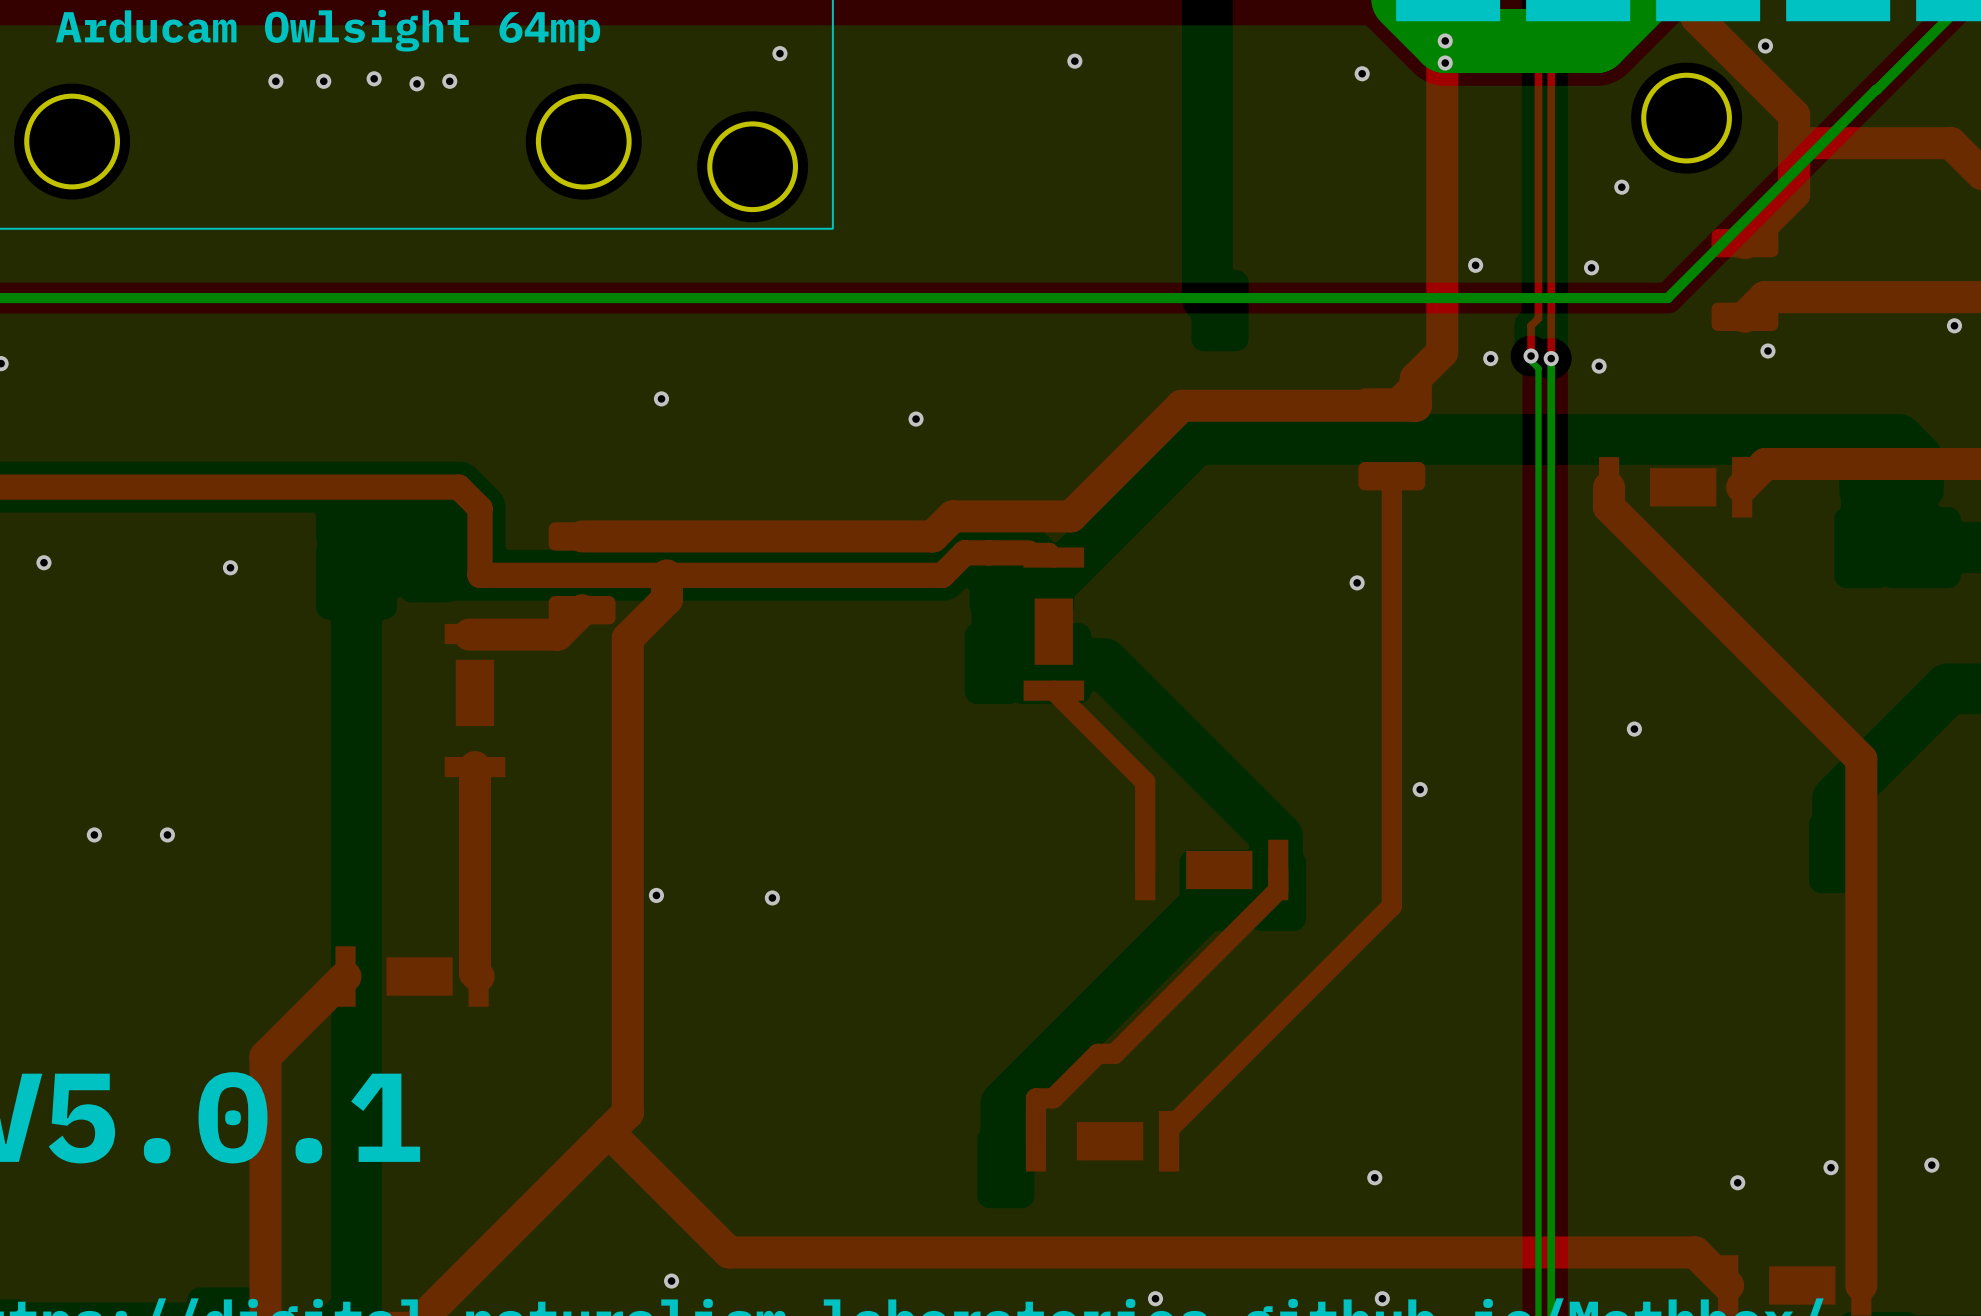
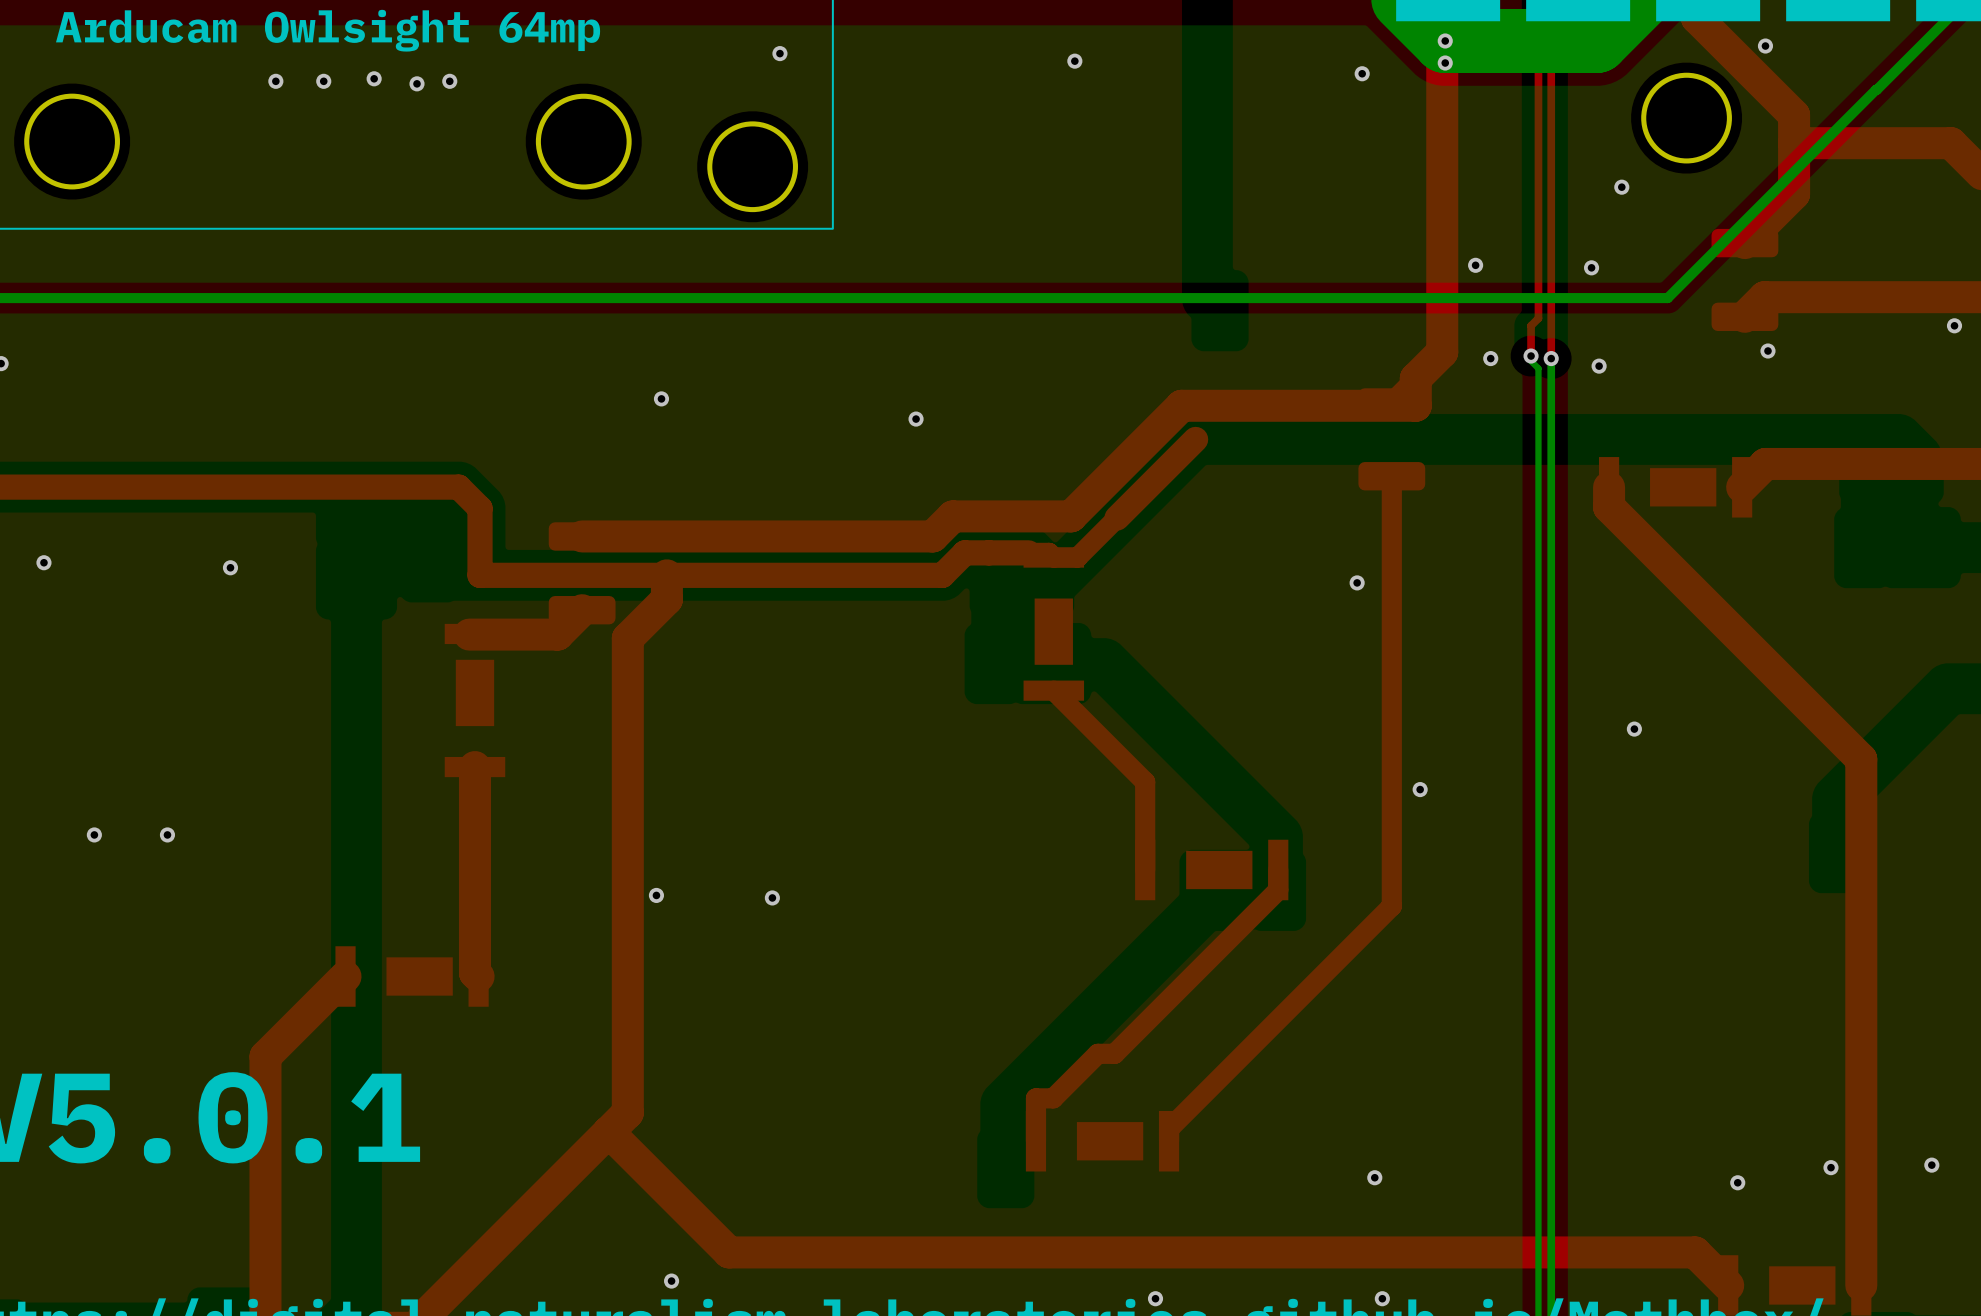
top track: none -> (1195, 439) (1077, 557) (1053, 557)

